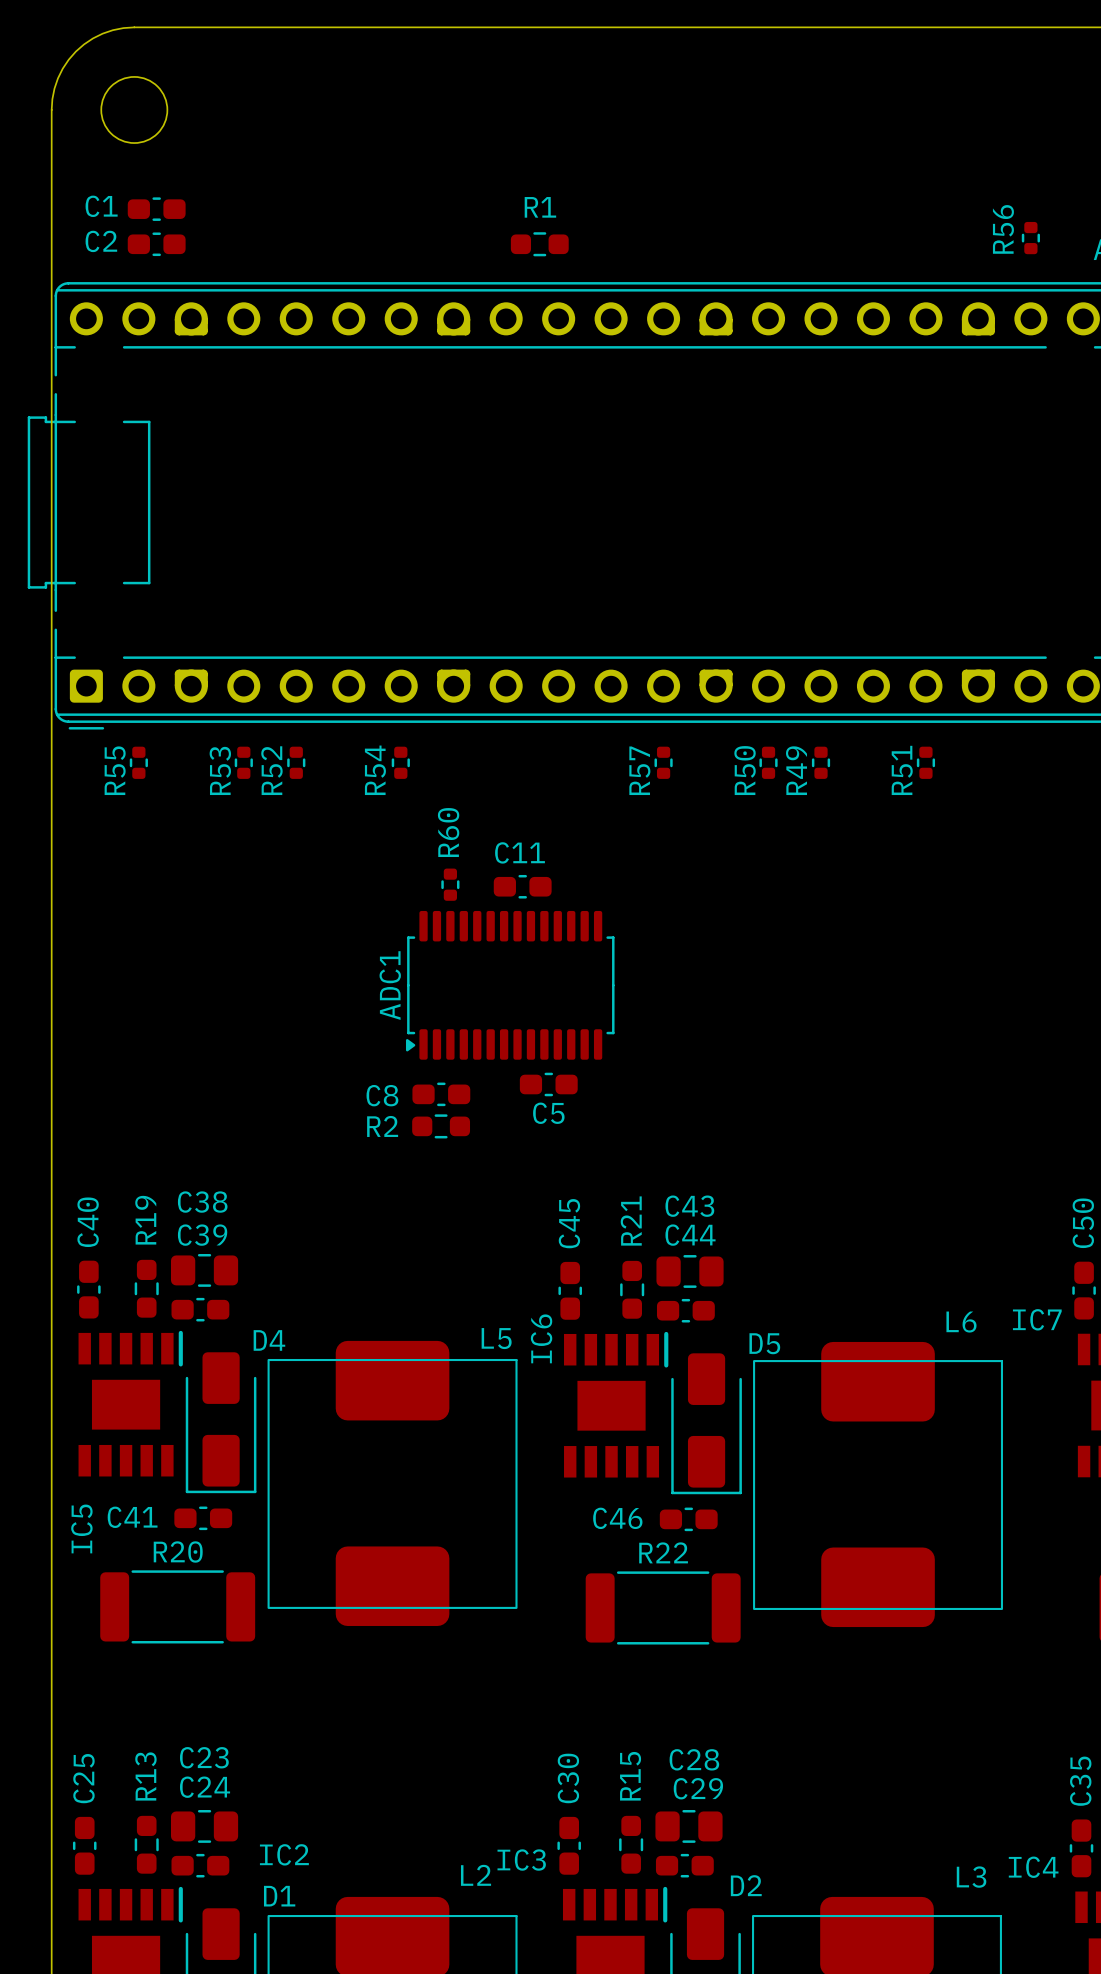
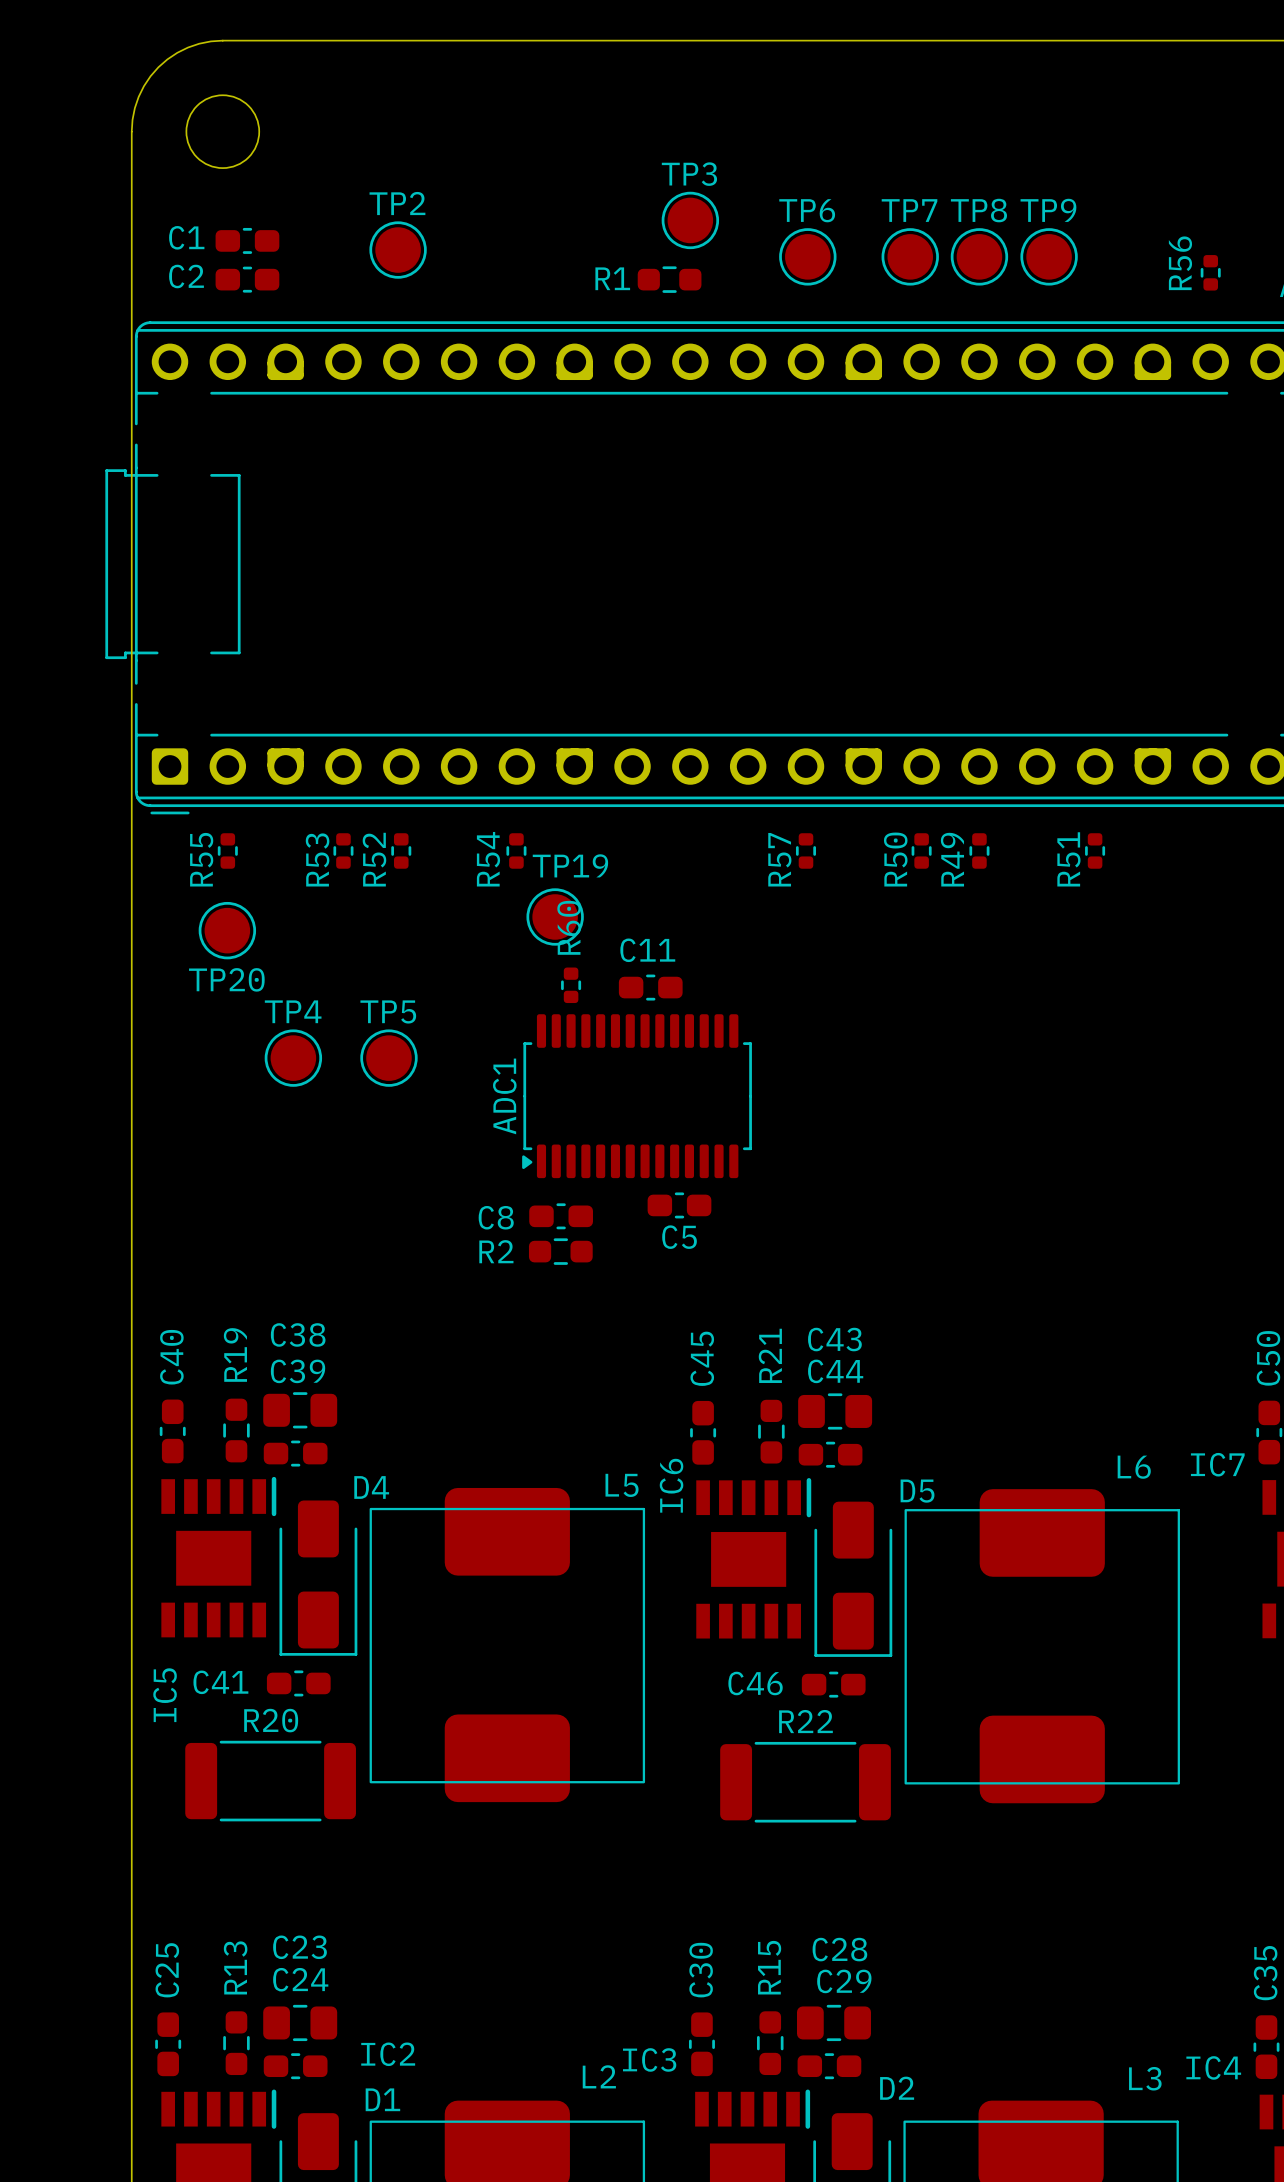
TP3: none -> (690, 220)
R1 name position: R1 (540, 207) -> R1 (612, 278)
TP2: none -> (398, 250)
TP6: none -> (807, 256)
TP7: none -> (910, 256)
TP8: none -> (979, 256)
TP9: none -> (1049, 256)
TP19: none -> (555, 916)
TP20: none -> (227, 930)
TP4: none -> (293, 1058)
TP5: none -> (388, 1058)

